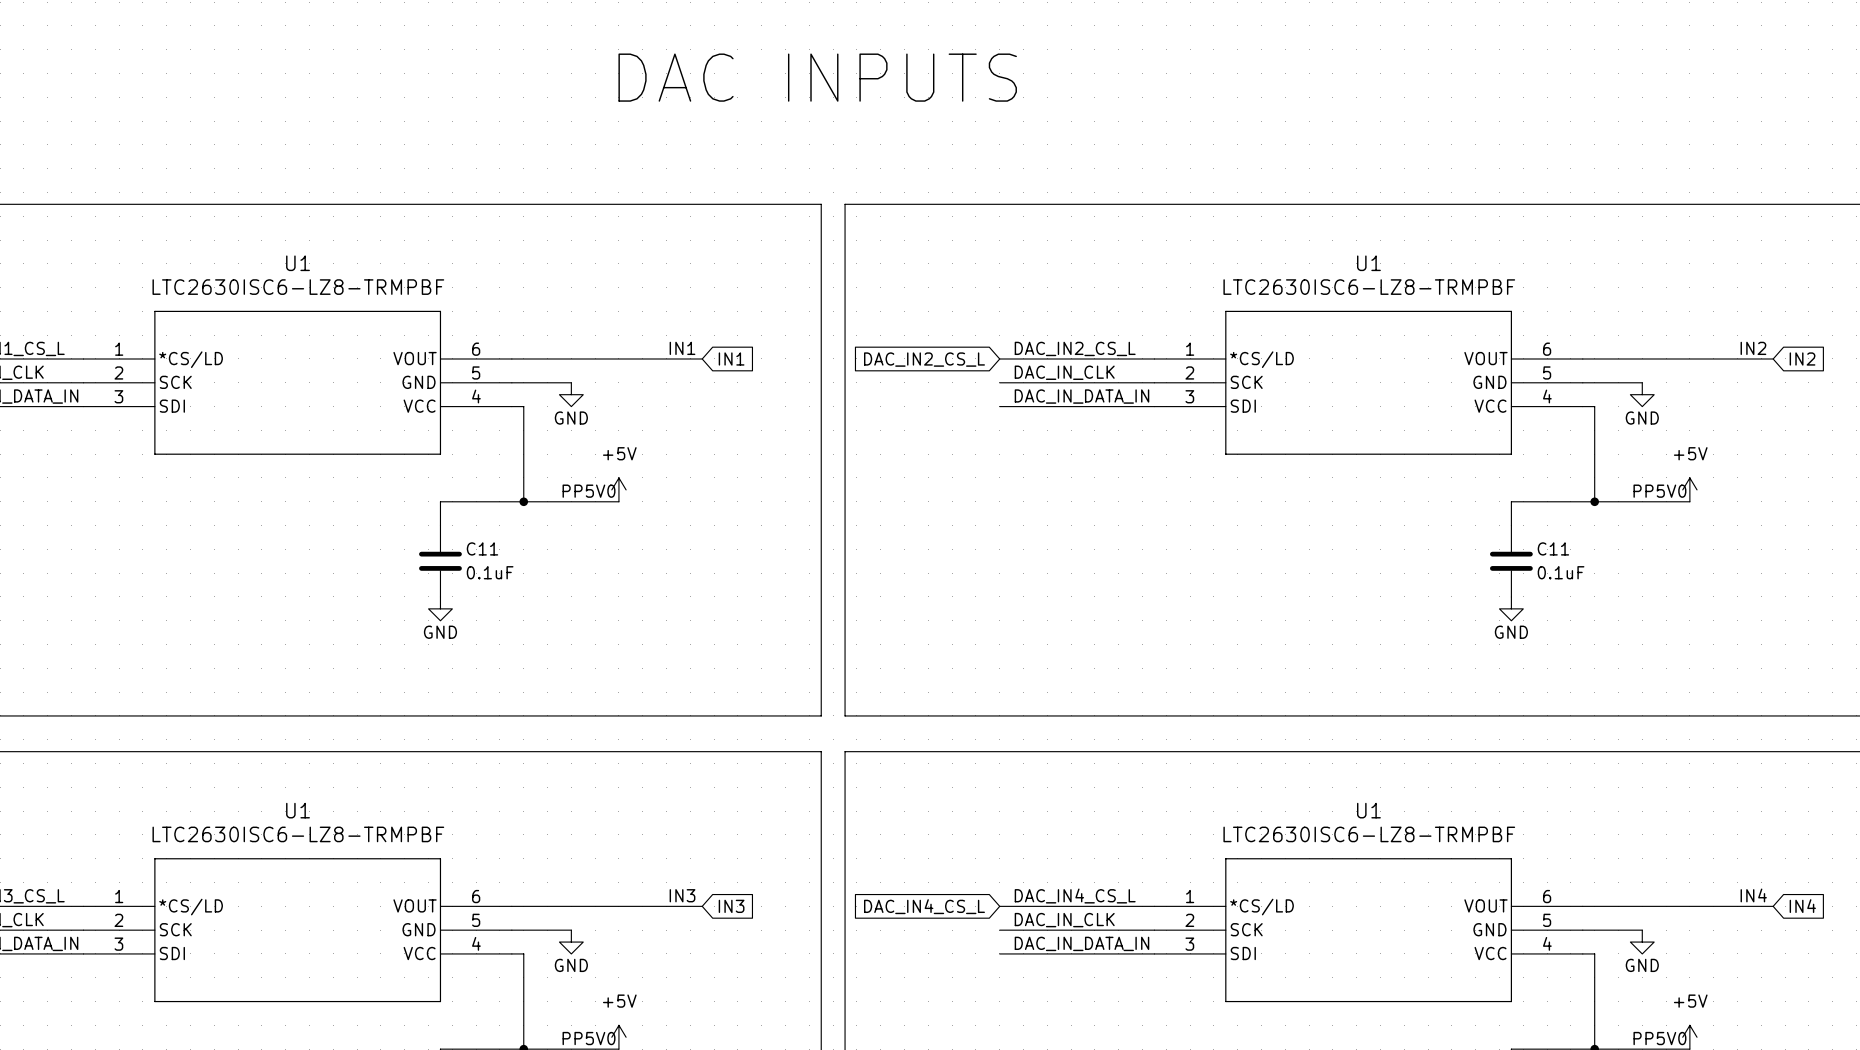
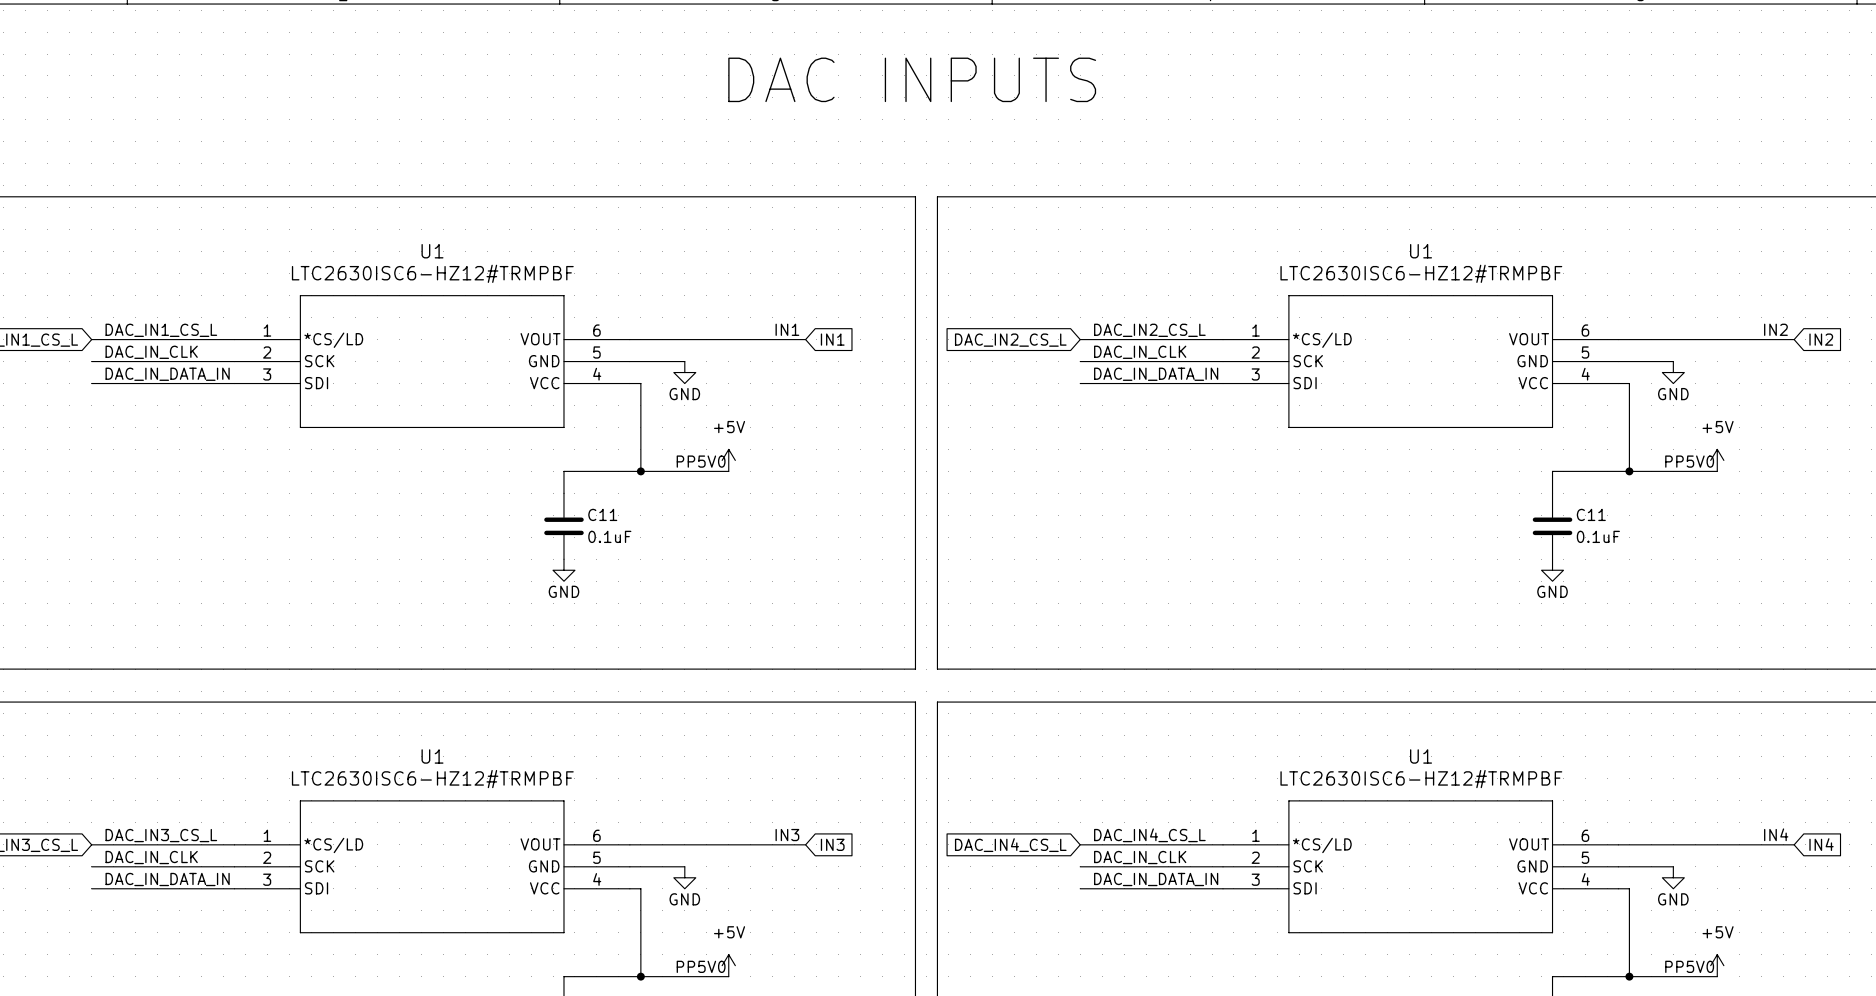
U1 value: LTC2630ISC6-LZ8-TRMPBF (298, 287) -> LTC2630ISC6-HZ12#TRMPBF (432, 273)
U1 value: LTC2630ISC6-LZ8-TRMPBF (1369, 287) -> LTC2630ISC6-HZ12#TRMPBF (1421, 273)
U1 value: LTC2630ISC6-LZ8-TRMPBF (298, 834) -> LTC2630ISC6-HZ12#TRMPBF (432, 779)
U1 value: LTC2630ISC6-LZ8-TRMPBF (1369, 834) -> LTC2630ISC6-HZ12#TRMPBF (1421, 779)

